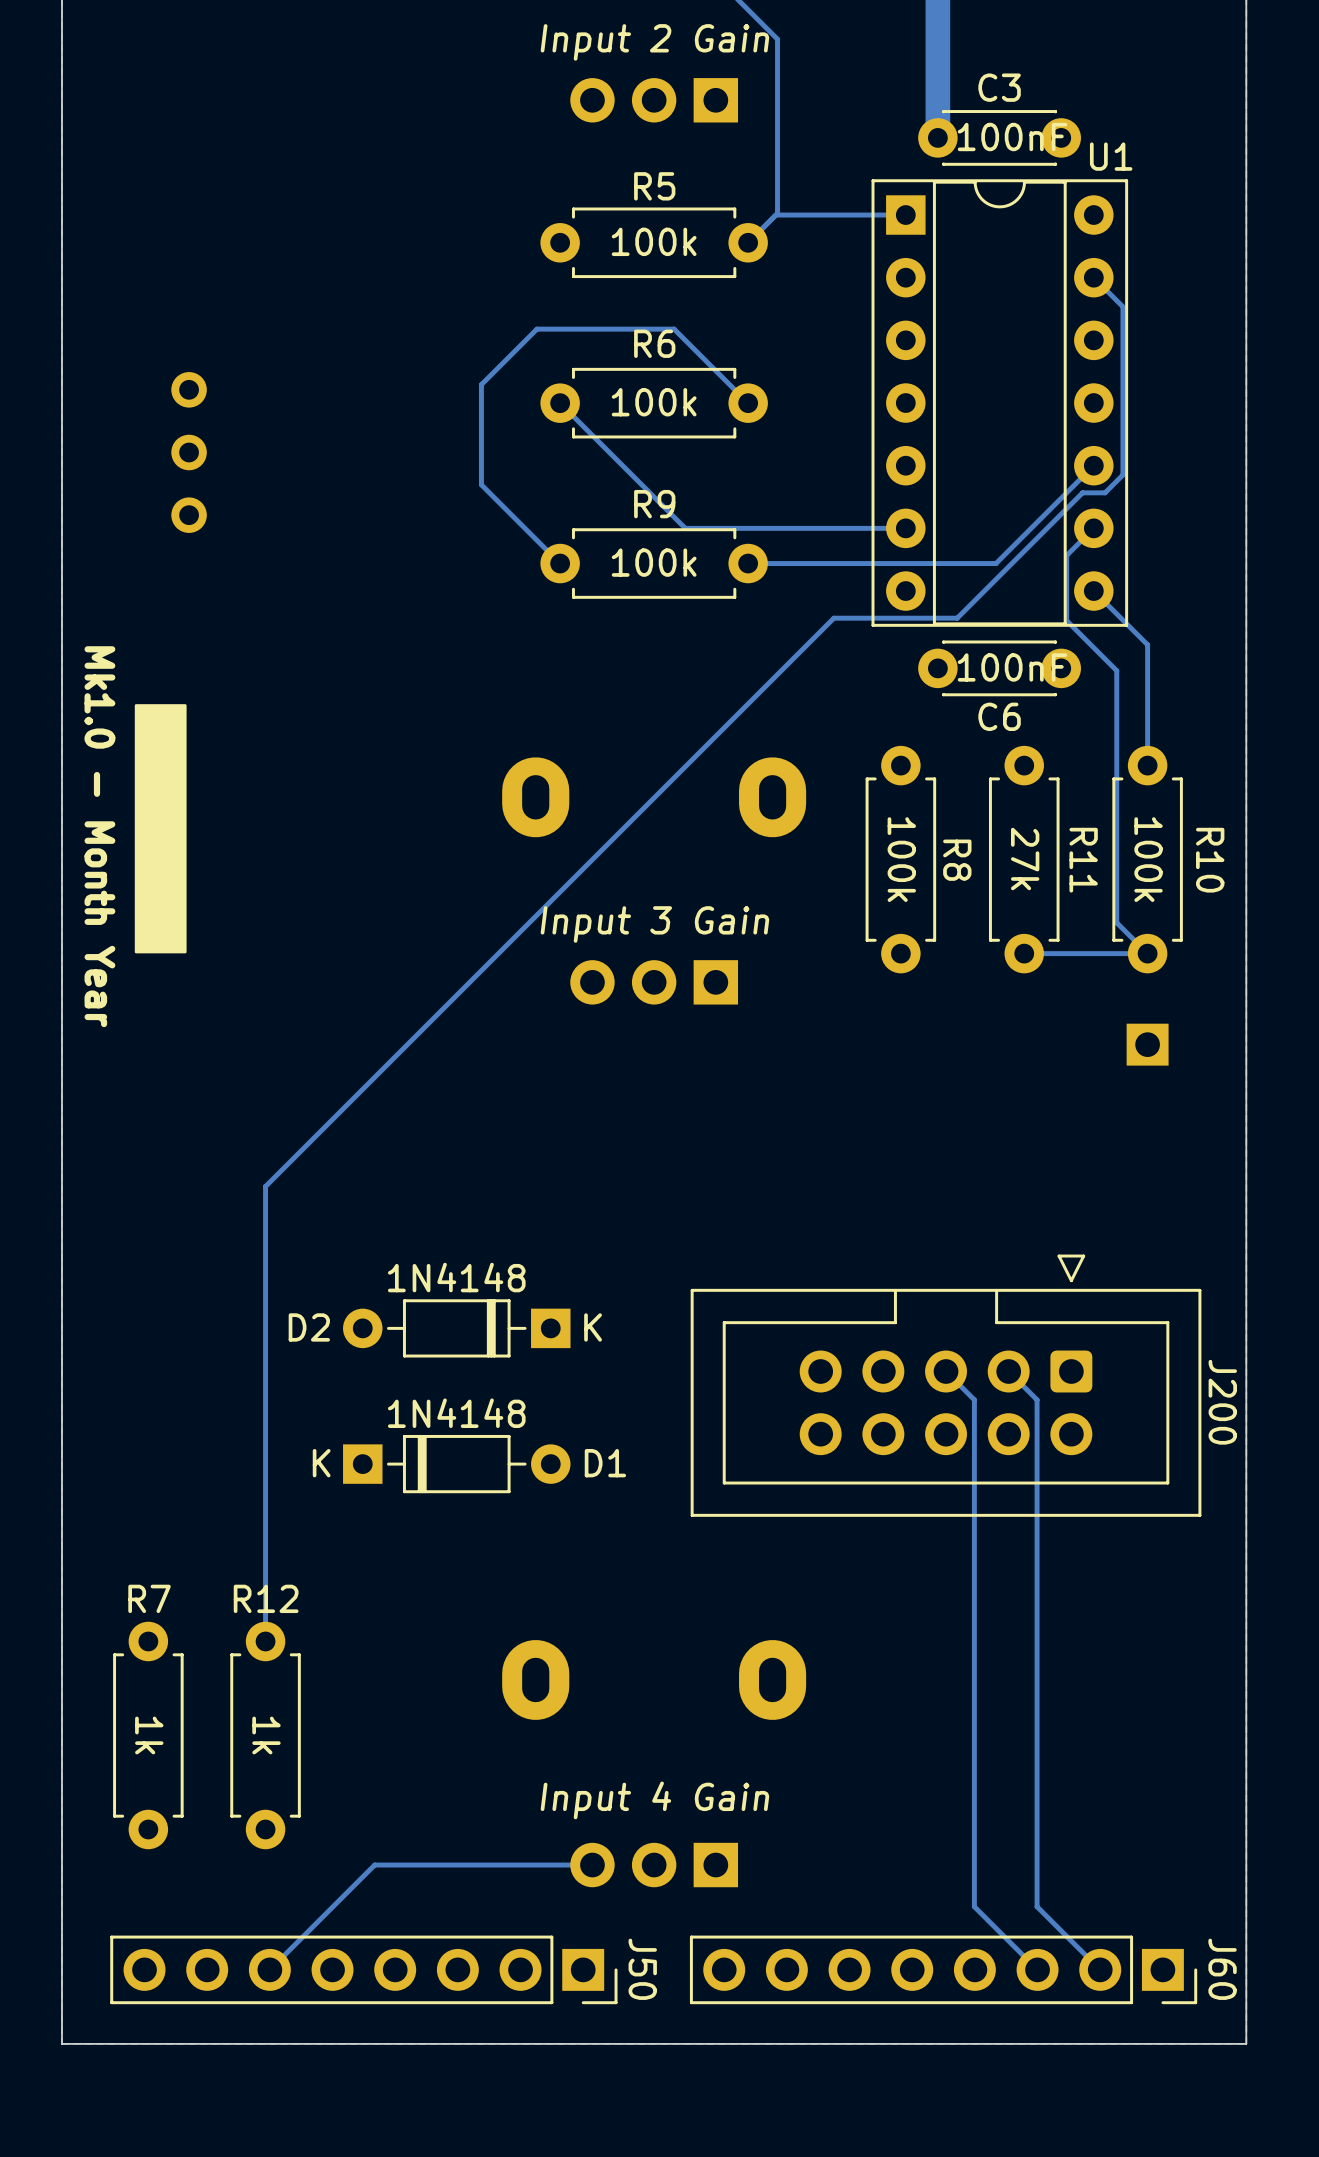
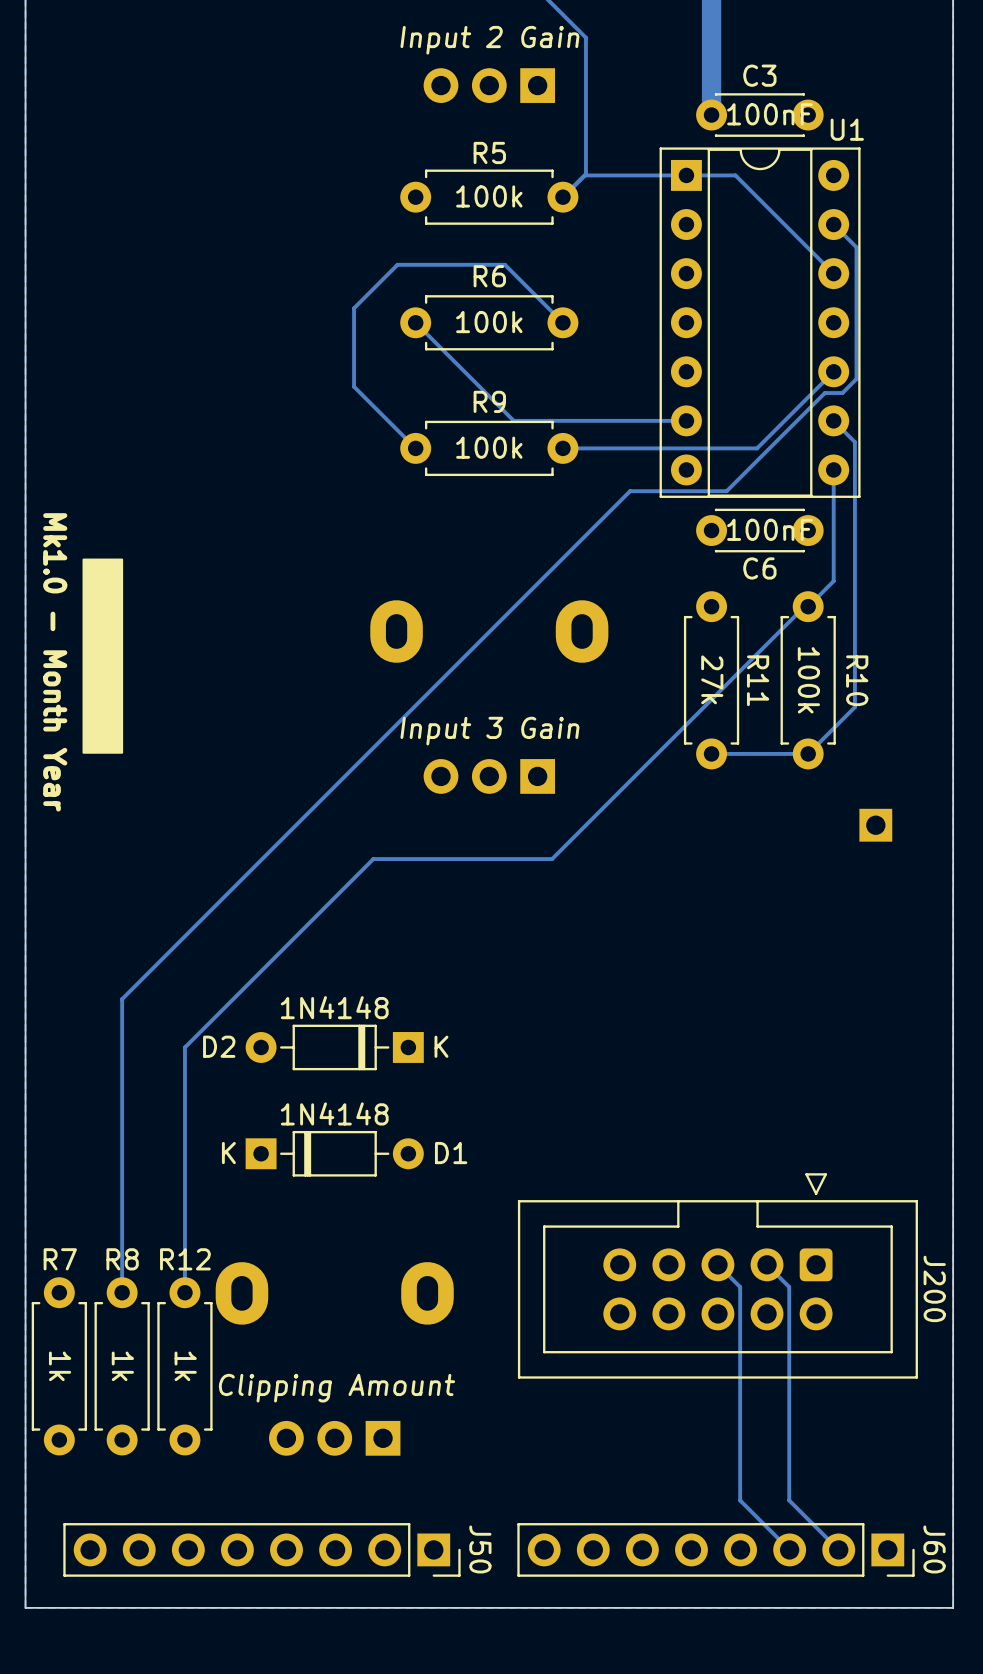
track: none -> (686, 175) (735, 175) (833, 273)
part: (189, 452) -> none
track: (1093, 528) (1066, 555) (1066, 620) (1116, 670) (1116, 922) (1147, 953) (1061, 953) -> (833, 420) (854, 442) (854, 707) (808, 753)
track: (1093, 591) (1147, 644) (1147, 765) -> (833, 469) (833, 581) (808, 606) (804, 606) (552, 859) (373, 859) (184, 1047)
R8 position: (900, 859) -> (122, 1366)
R8 value: 100k (901, 859) -> 1k (122, 1366)
R11 position: (1024, 859) -> (711, 680)
R10 position: (1147, 859) -> (808, 680)
R8 name rotation: 0° (957, 860) -> 90° counterclockwise (122, 1259)
R8 name position: R8 (957, 860) -> R8 (122, 1259)
track: none -> (779, 753) (711, 753)
track: (265, 1186) (265, 1328) -> (184, 936) (122, 999) (122, 1292)
track: (946, 1371) (974, 1399) (974, 1634) -> (717, 1264) (740, 1287)
track: (1008, 1371) (1037, 1399) (1037, 1634) -> (767, 1264) (789, 1287)
J200 position: (946, 1385) -> (717, 1275)
part: none -> (334, 1358)
R7 position: (148, 1735) -> (59, 1366)
part: (654, 1763) -> none
track: (592, 1865) (374, 1865) (269, 1969) -> none

